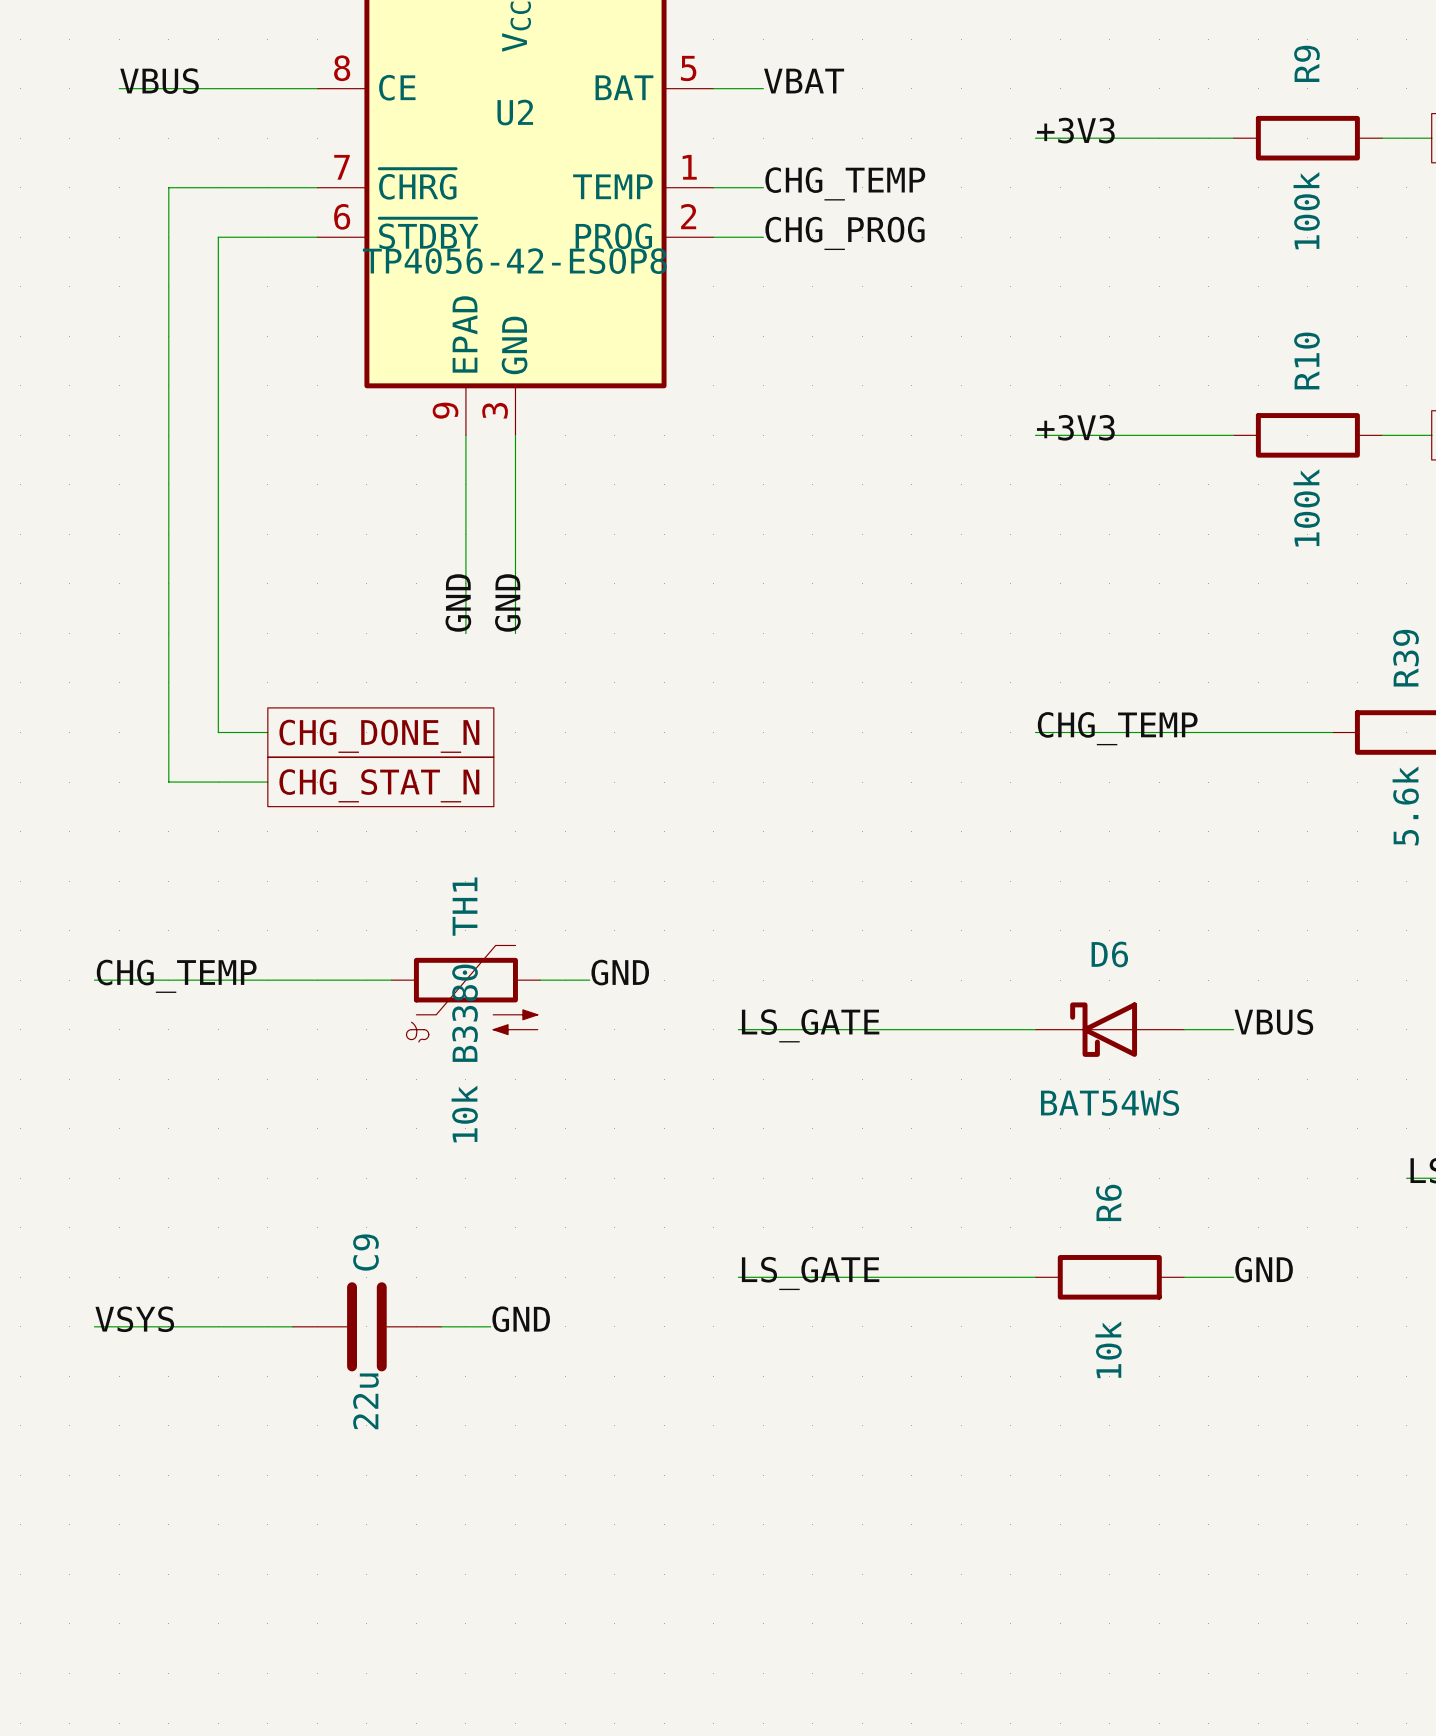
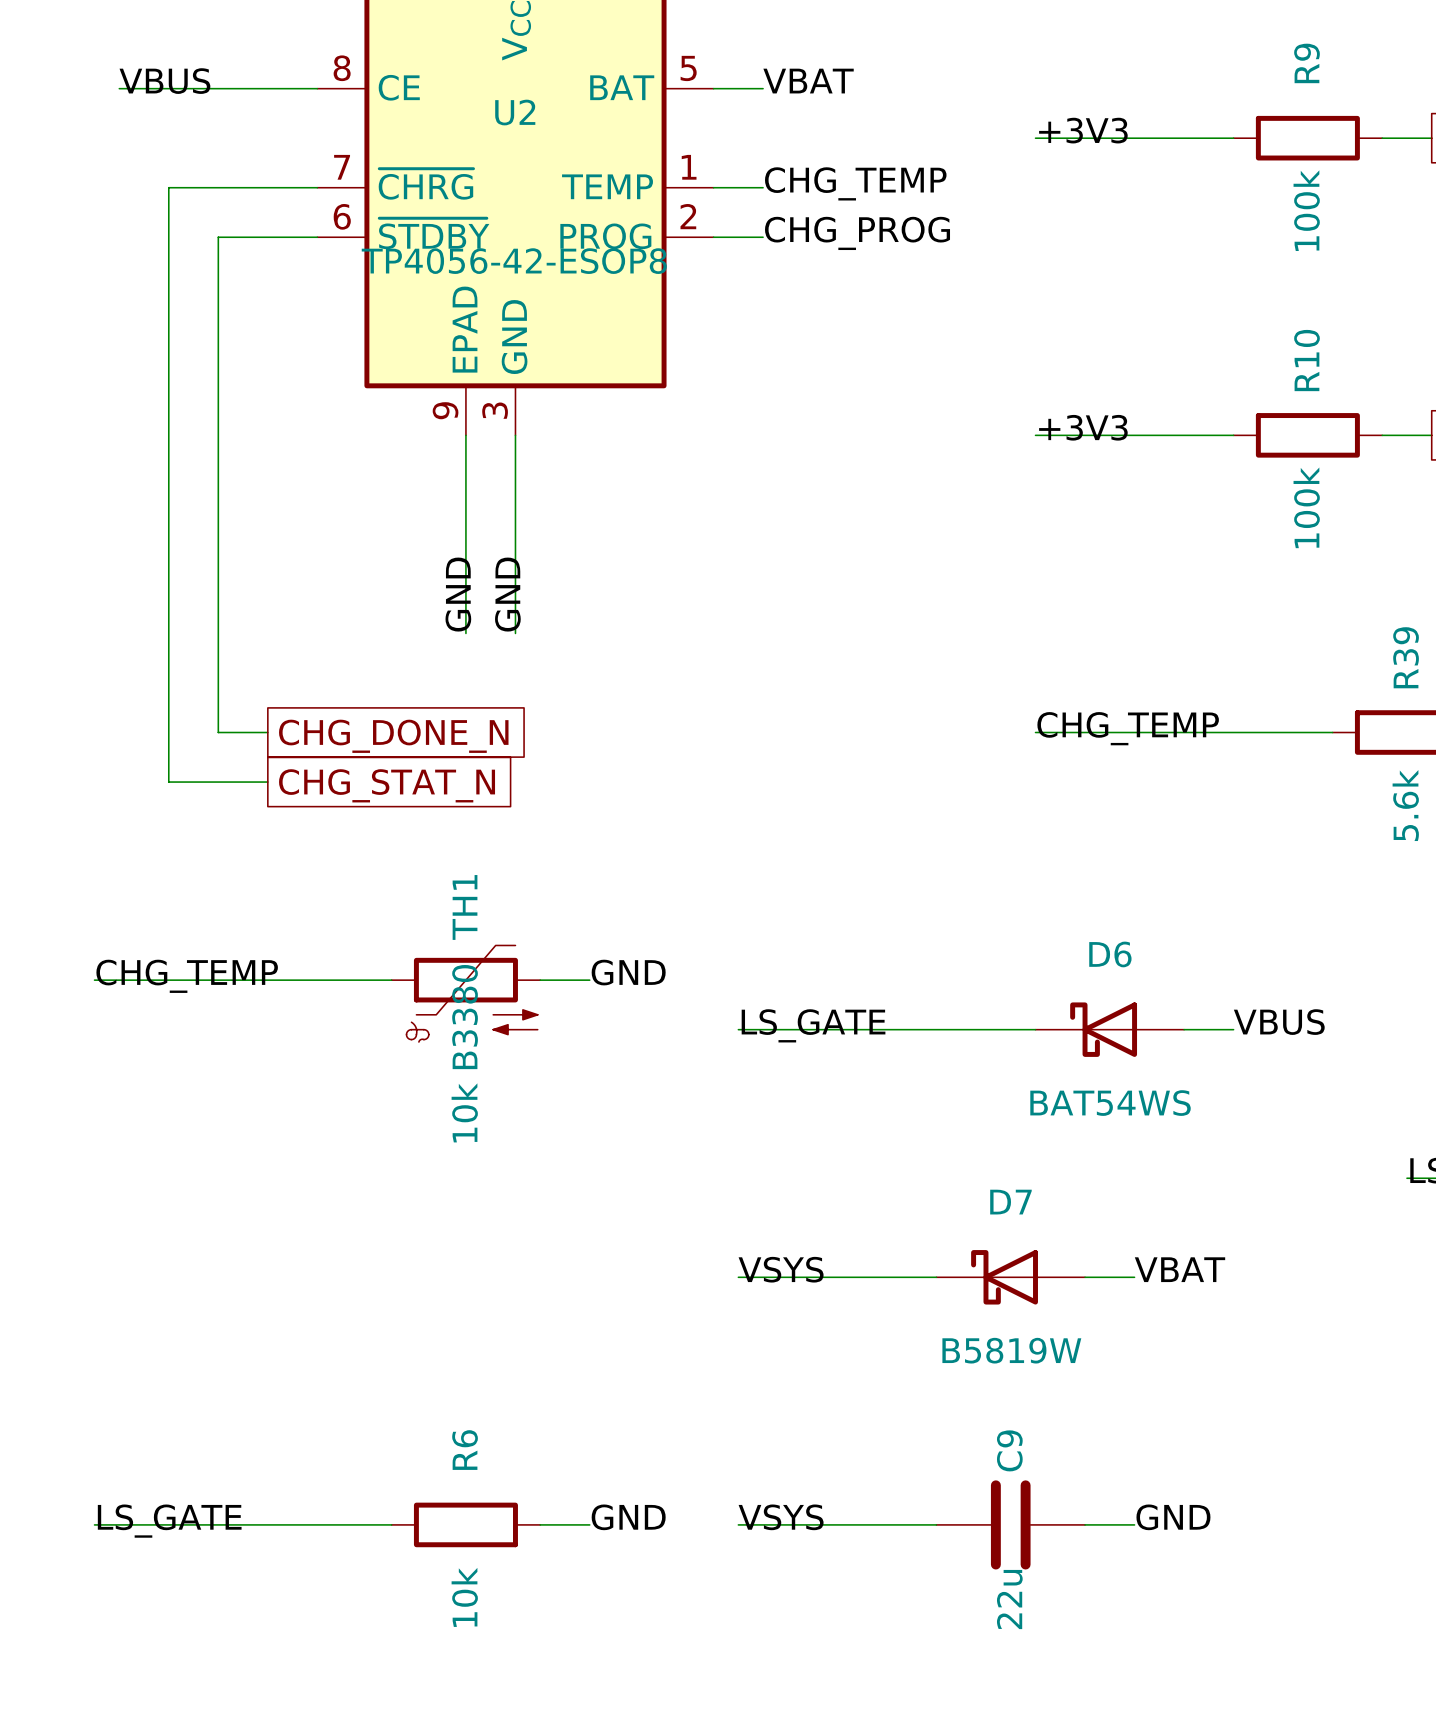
label: none -> VBAT (1180, 1269)
label position: GND (1264, 1269) -> GND (1173, 1517)
label: LS_GATE (810, 1273) -> VSYS (781, 1269)
D7: none -> B5819W (1010, 1277)
R6 position: (1109, 1277) -> (465, 1524)
wire: (1184, 1277) (1233, 1277) -> (1085, 1277) (1134, 1277)
label: VSYS (134, 1319) -> none
label position: GND (521, 1319) -> GND (628, 1517)
wire: (94, 1326) (292, 1326) -> none
C9 position: (366, 1326) -> (1010, 1524)
wire: (441, 1326) (490, 1326) -> (540, 1524) (589, 1524)
label: none -> VSYS (781, 1517)
label: none -> LS_GATE (169, 1521)
wire: none -> (94, 1524) (391, 1524)
wire: none -> (738, 1524) (936, 1524)
wire: none -> (1085, 1524) (1134, 1524)

